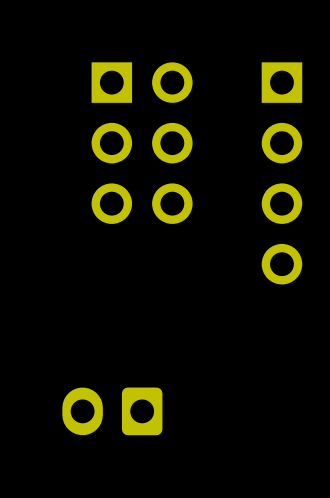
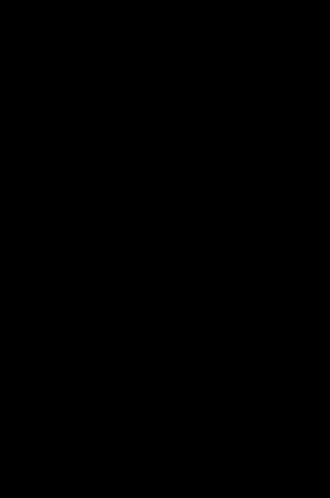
part: (142, 143) -> none
part: (281, 173) -> none
part: (112, 411) -> none

